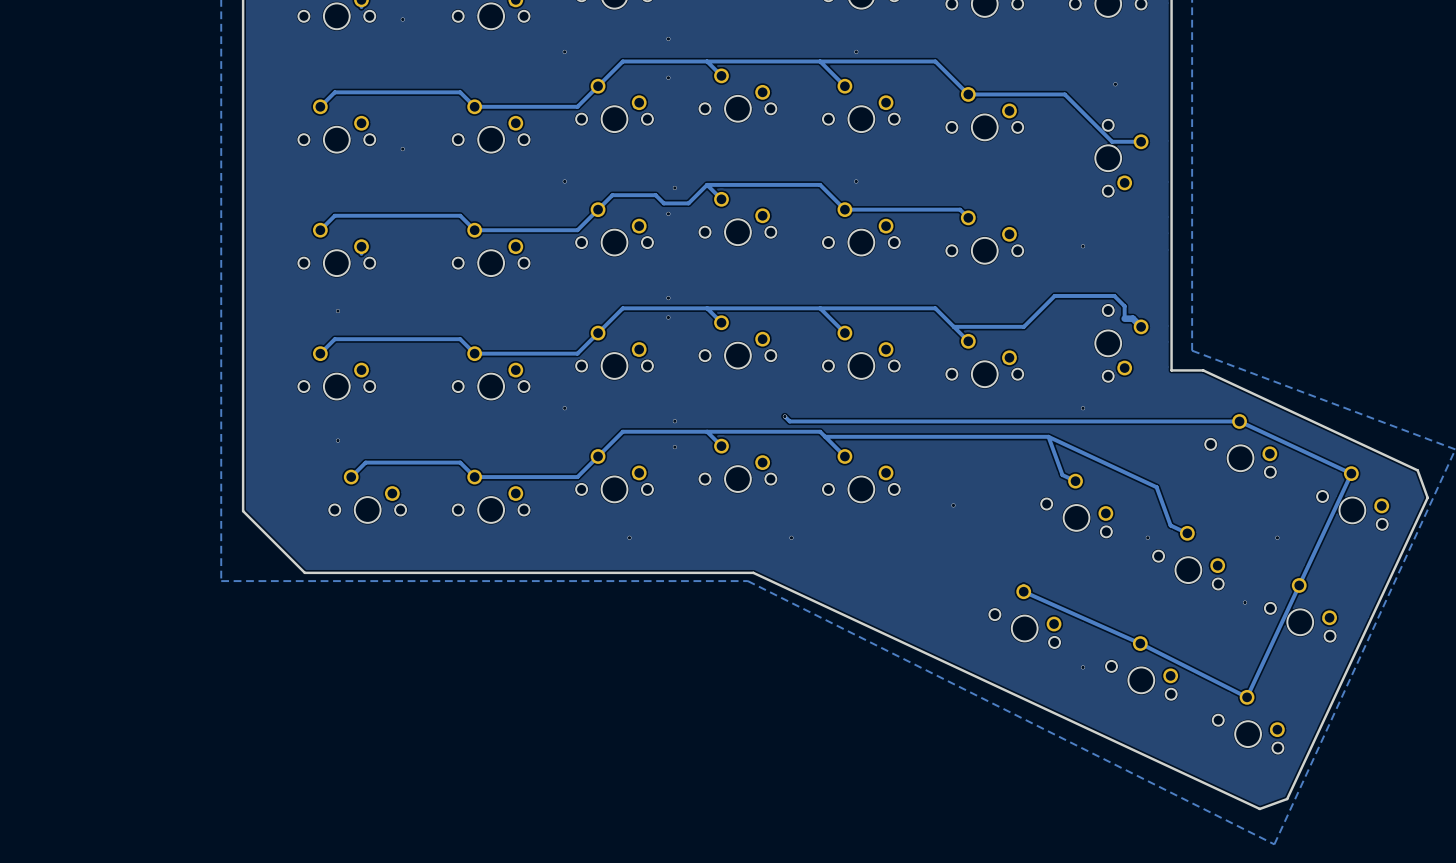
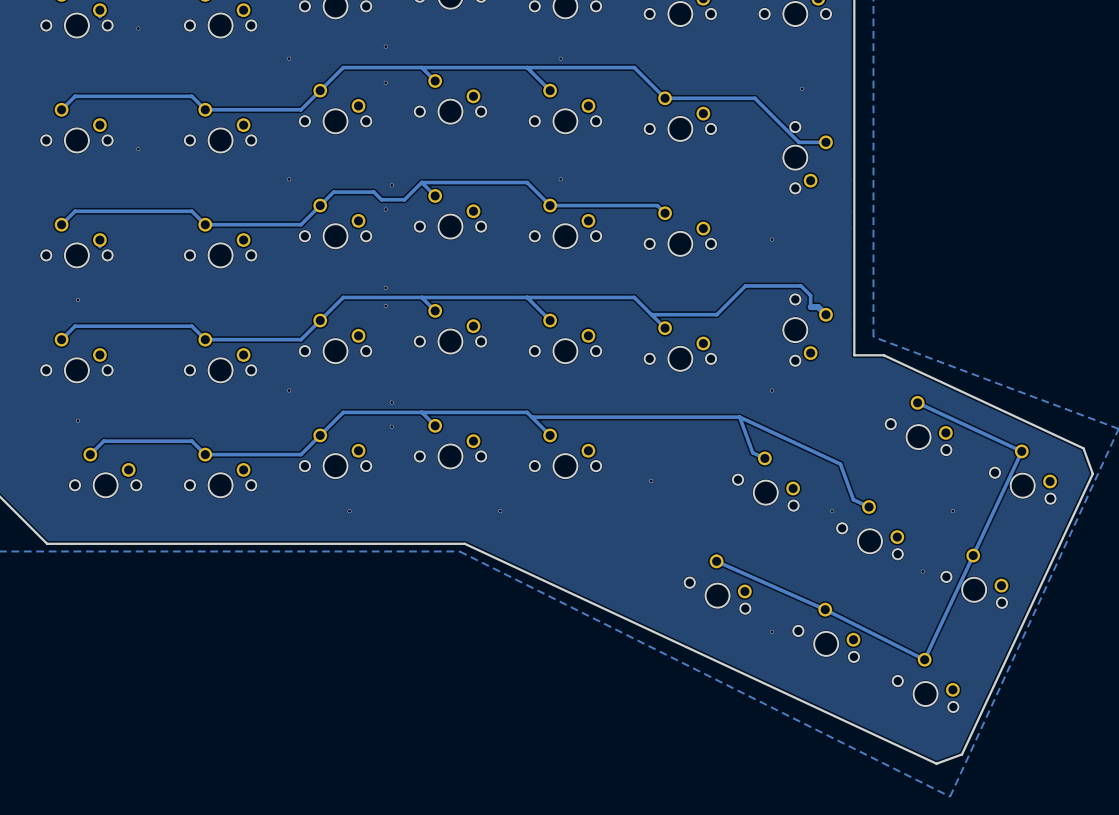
track: (784, 416) (789, 421) (1239, 421) -> none
via: (784, 416) -> none

